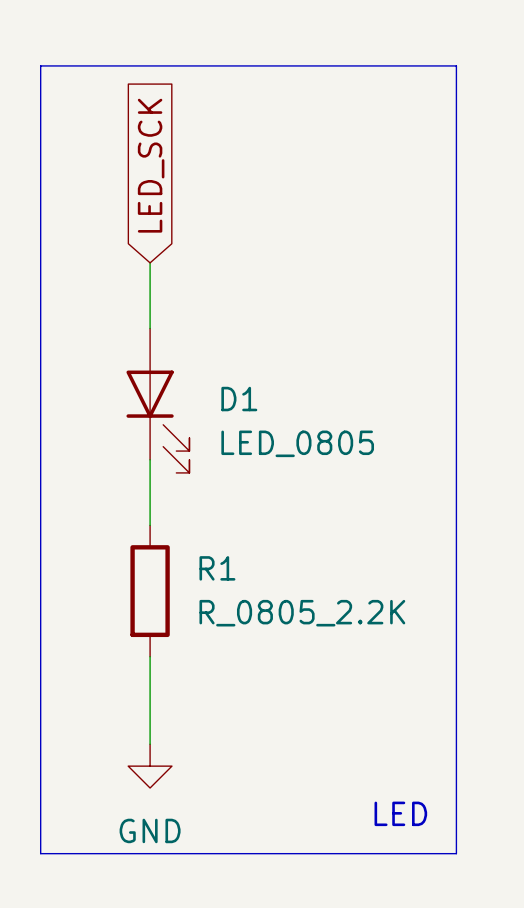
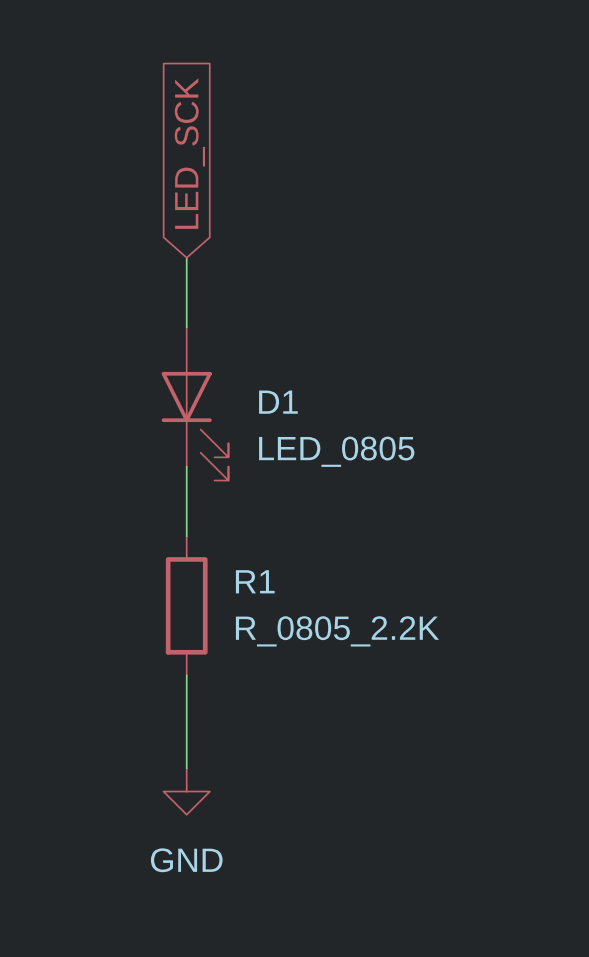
line: (40, 65) (456, 65) (456, 853) (40, 853) (40, 65) -> none
text: LED (400, 813) -> none

